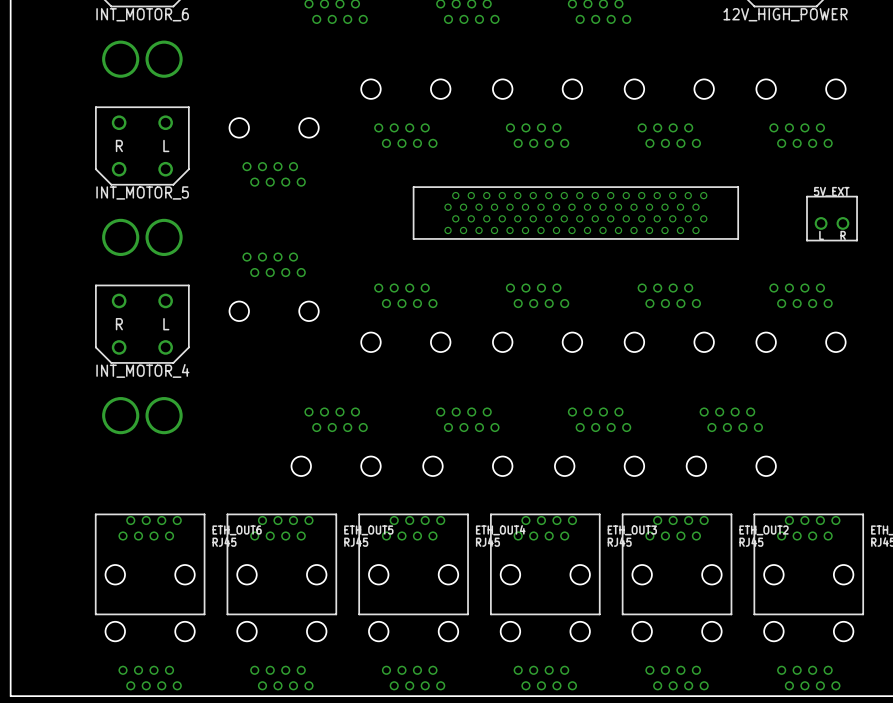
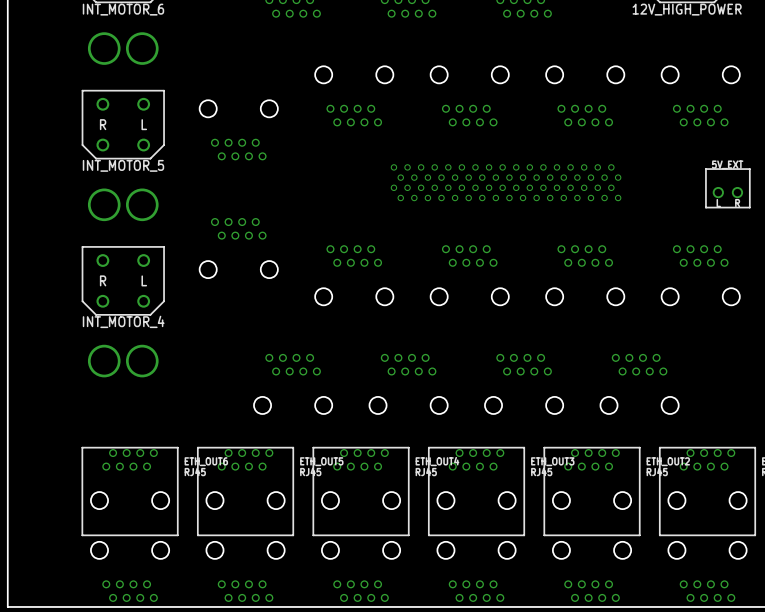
part side: bottom (575, 213) -> top (506, 182)

